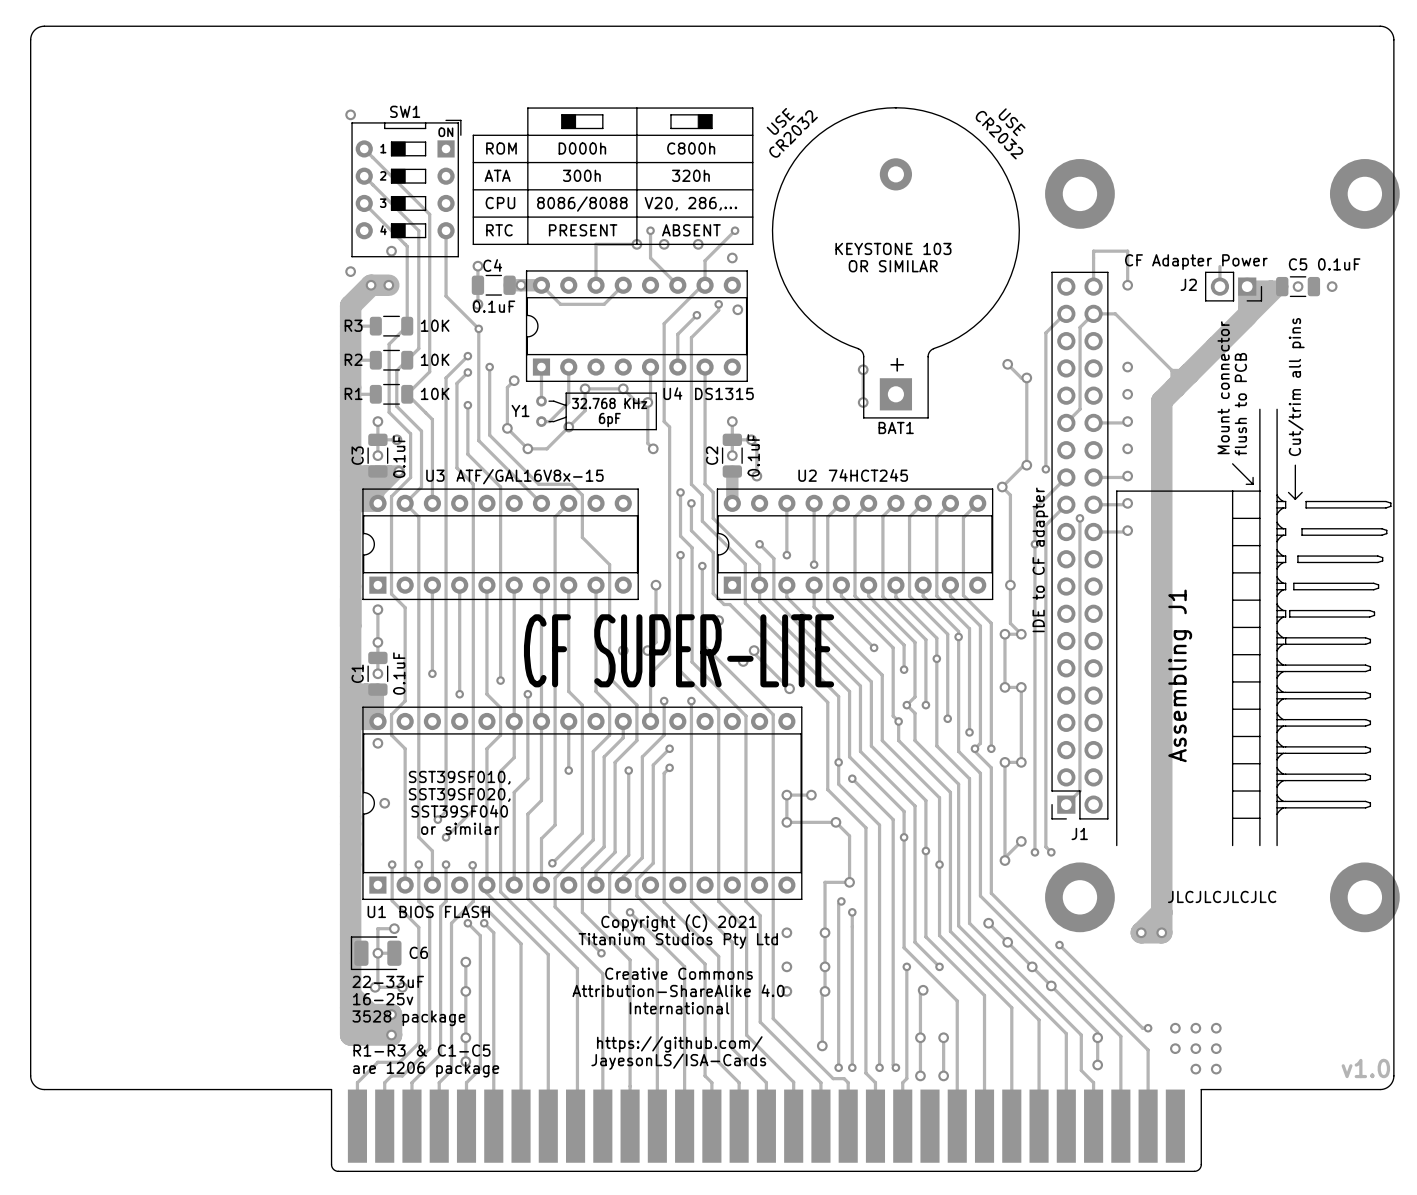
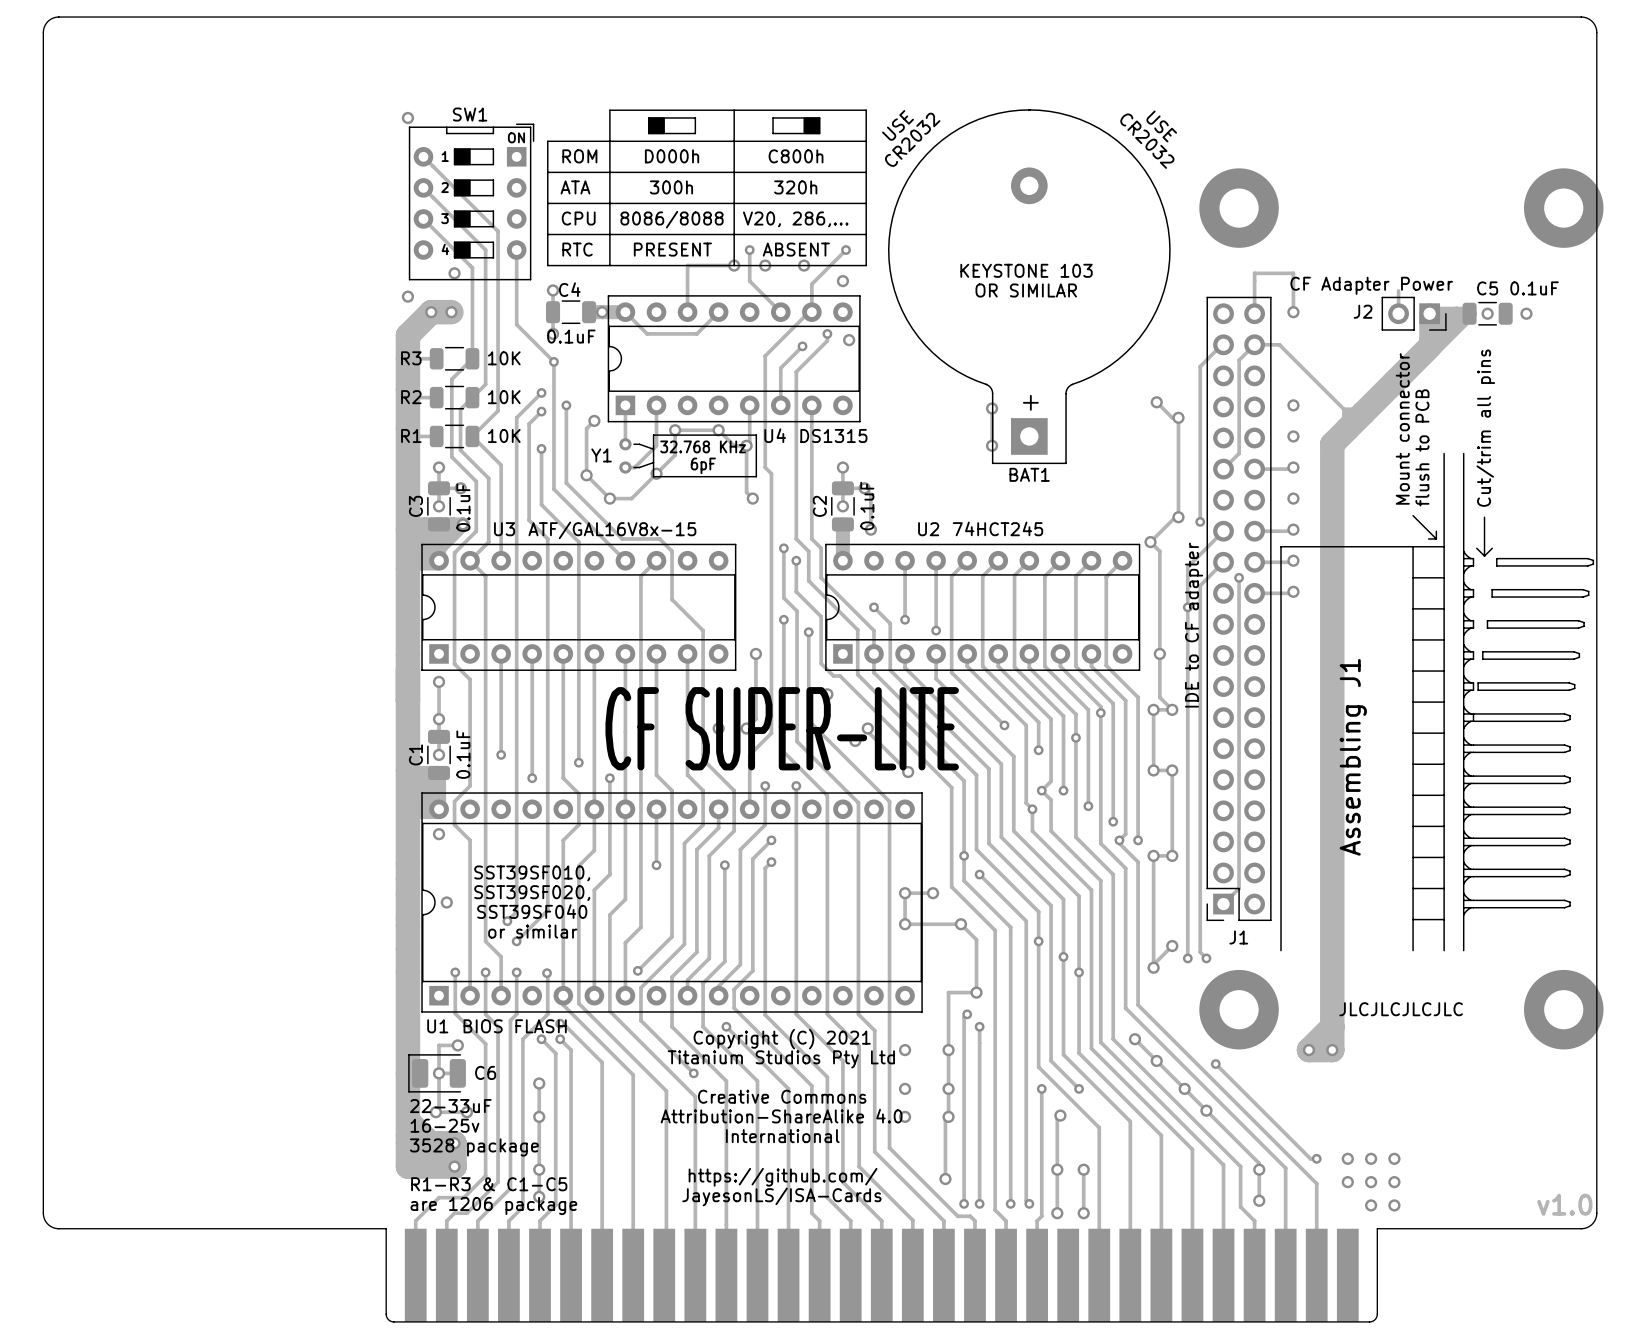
part footprint: [347, 1089, 1185, 1163] -> [404, 1228, 1359, 1322]

